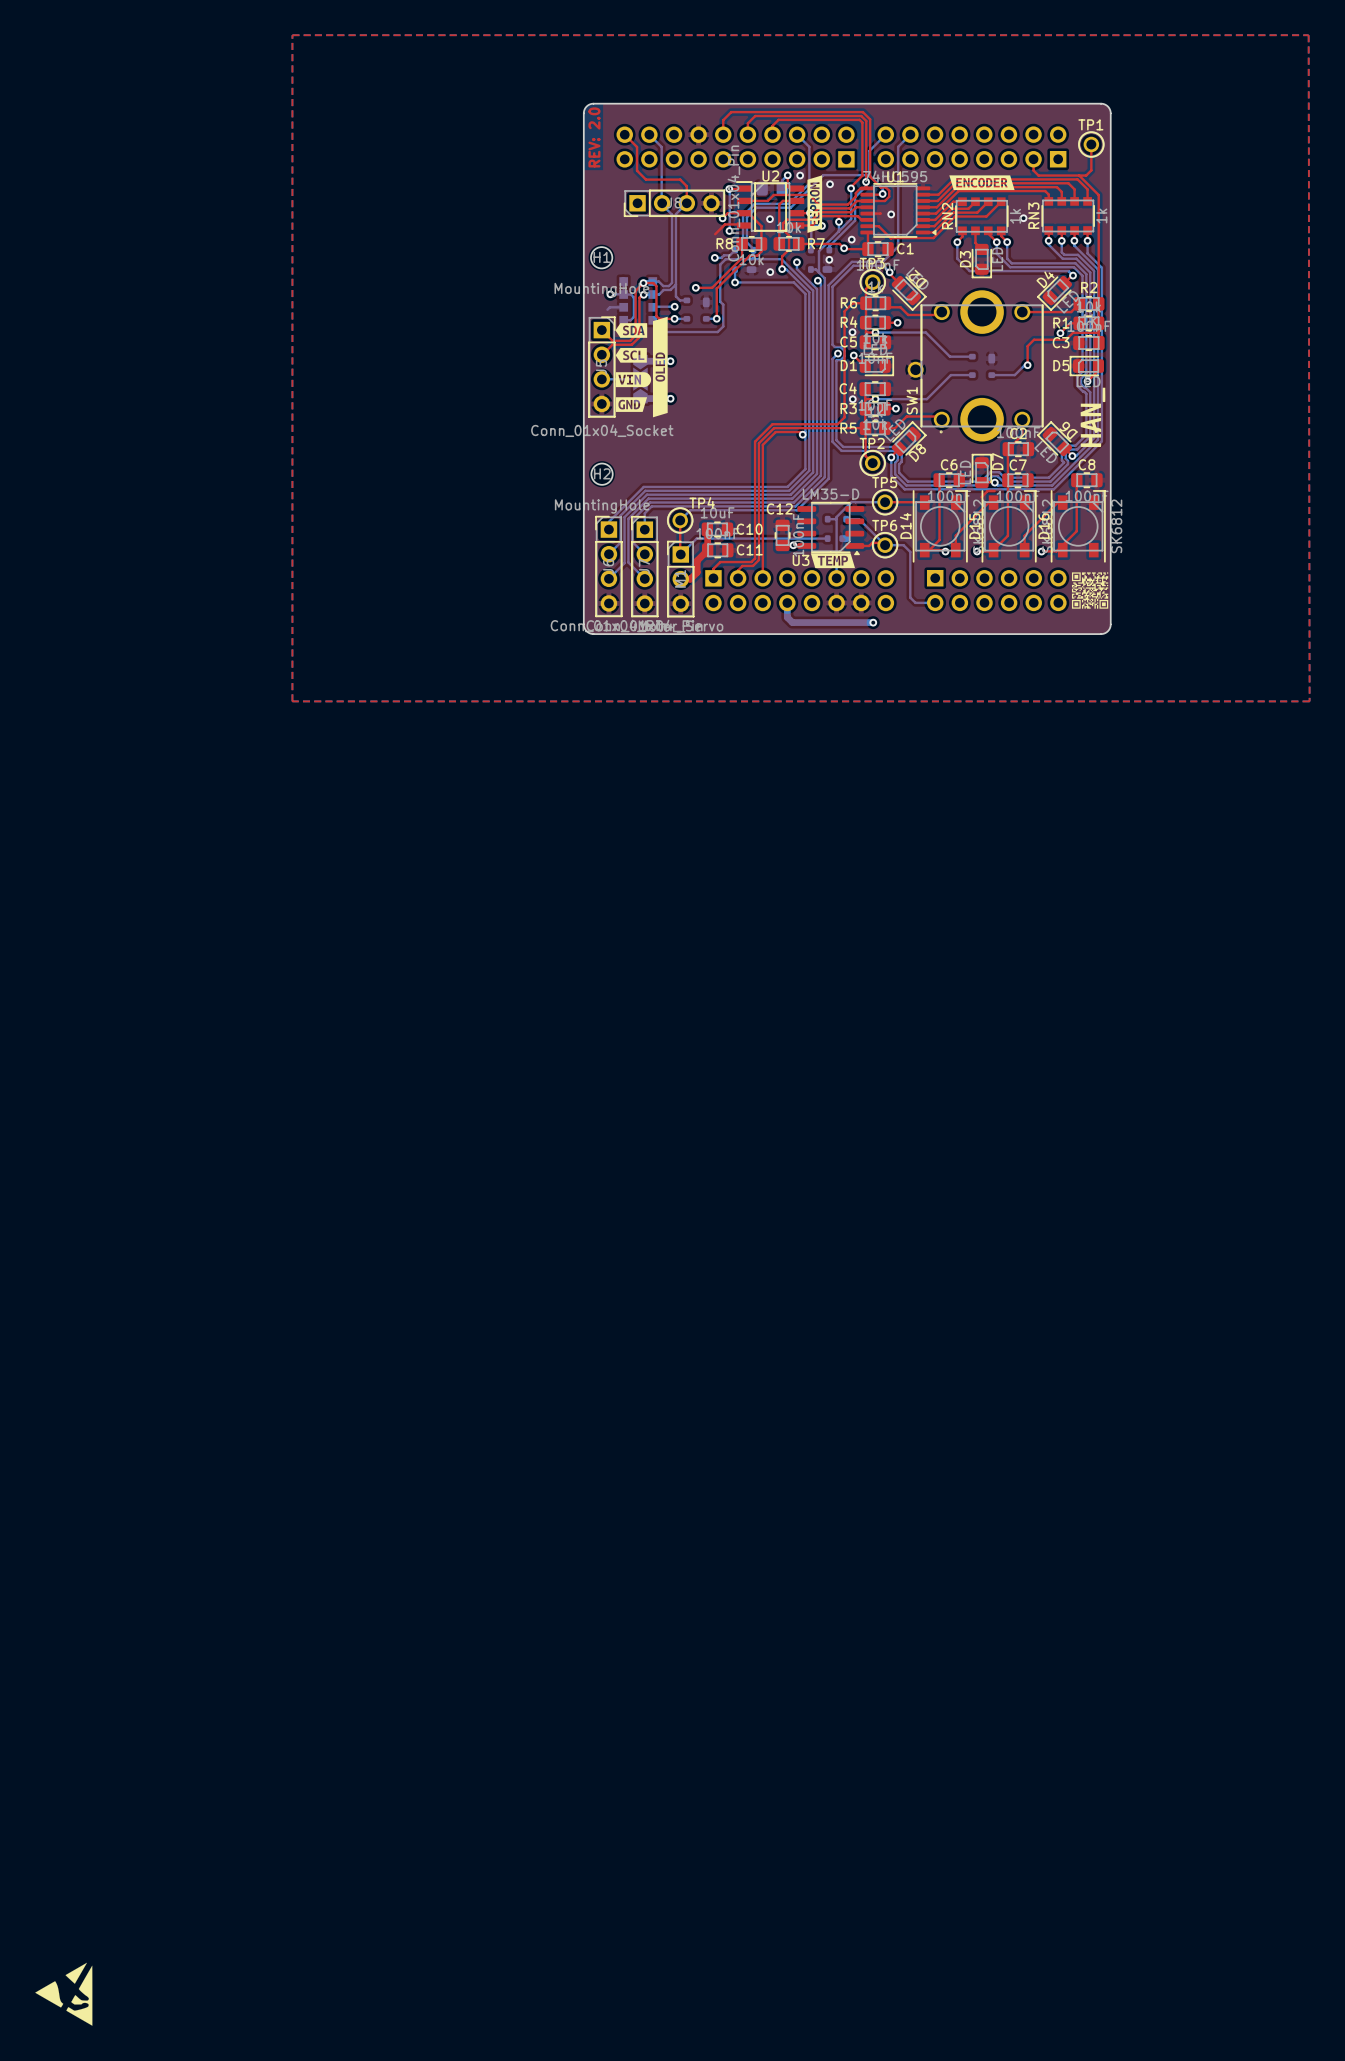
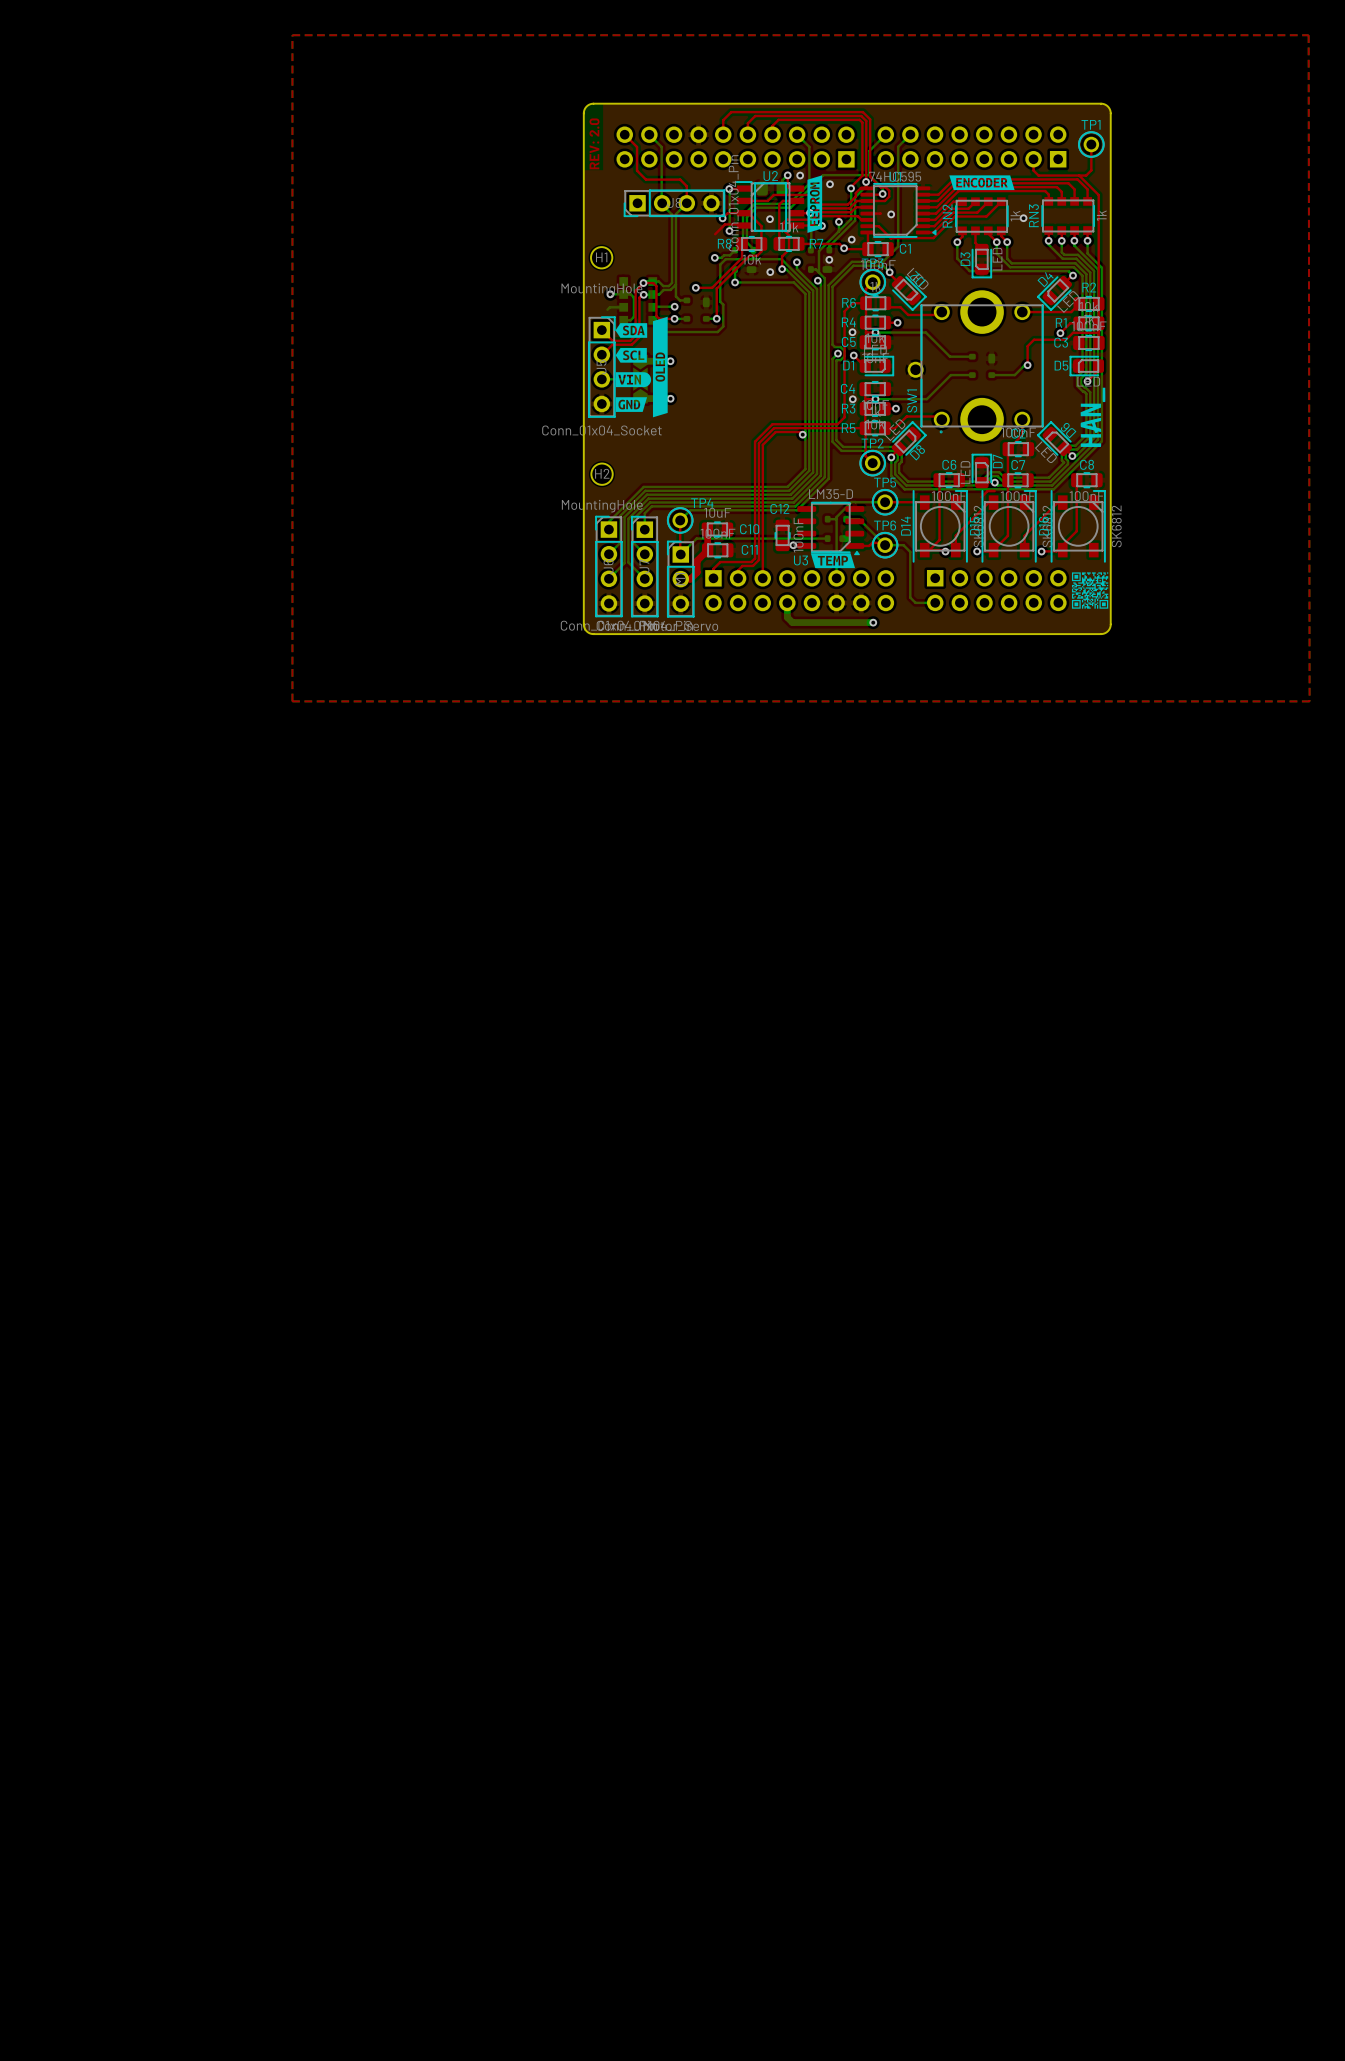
drawing: [35, 1962, 93, 2026] -> none

